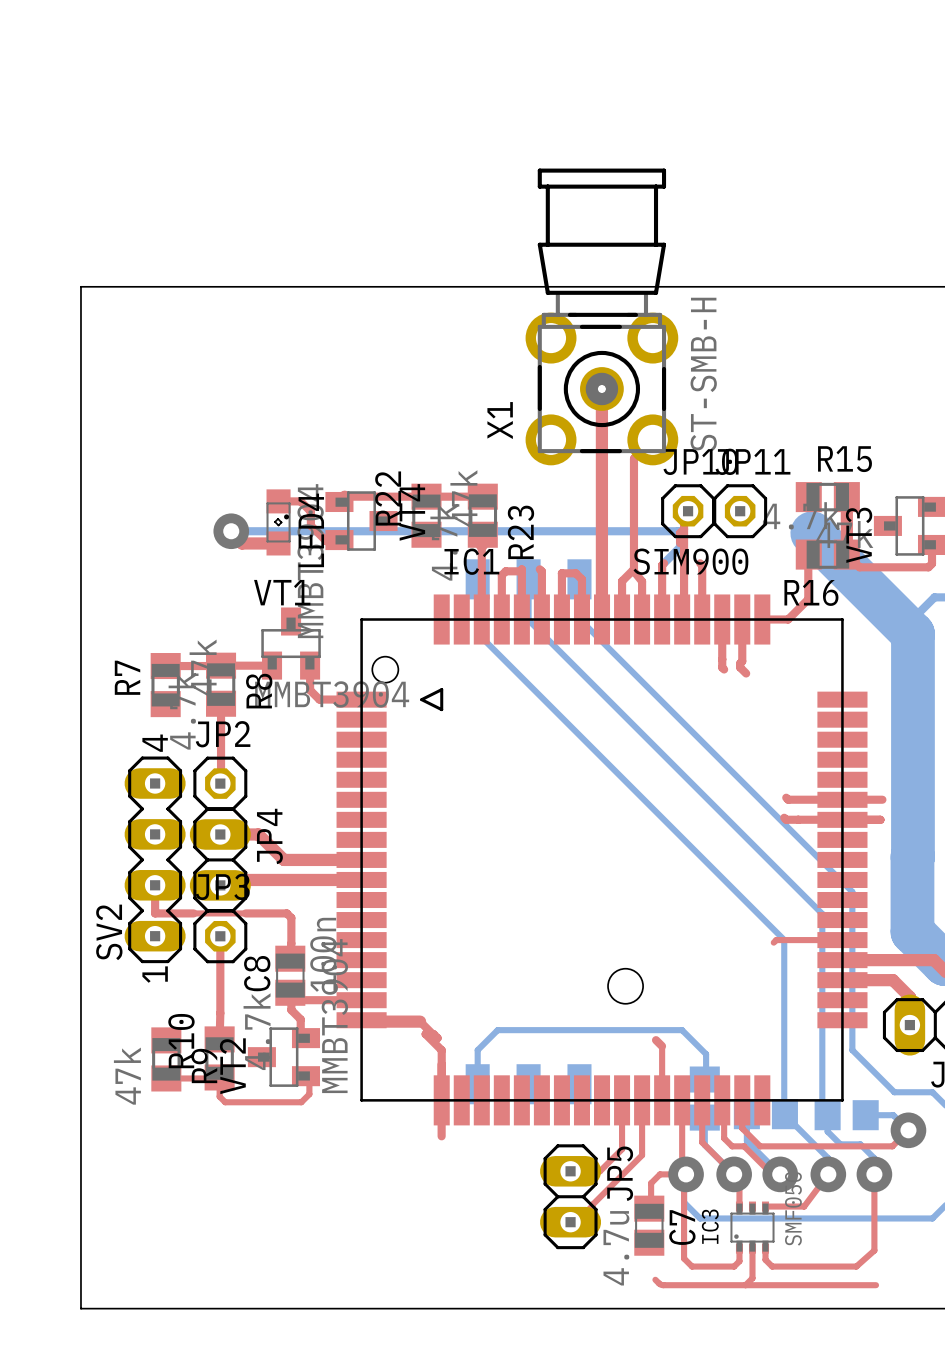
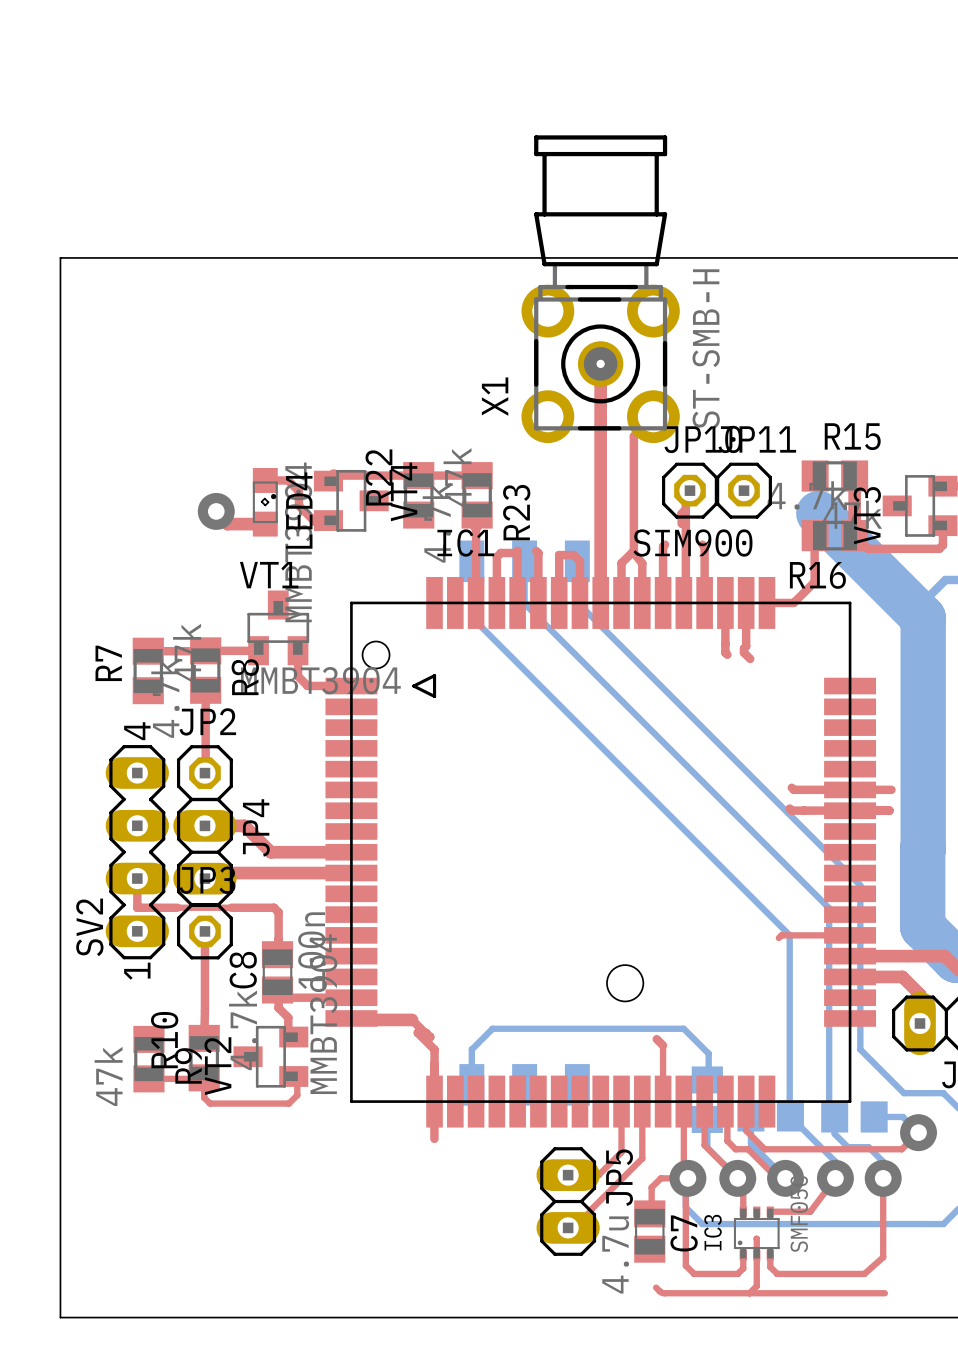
bottom track: (231, 531) (678, 531) (680, 533) (680, 547) (664, 563) -> none
top track: none -> (756, 1238) (756, 1255)

